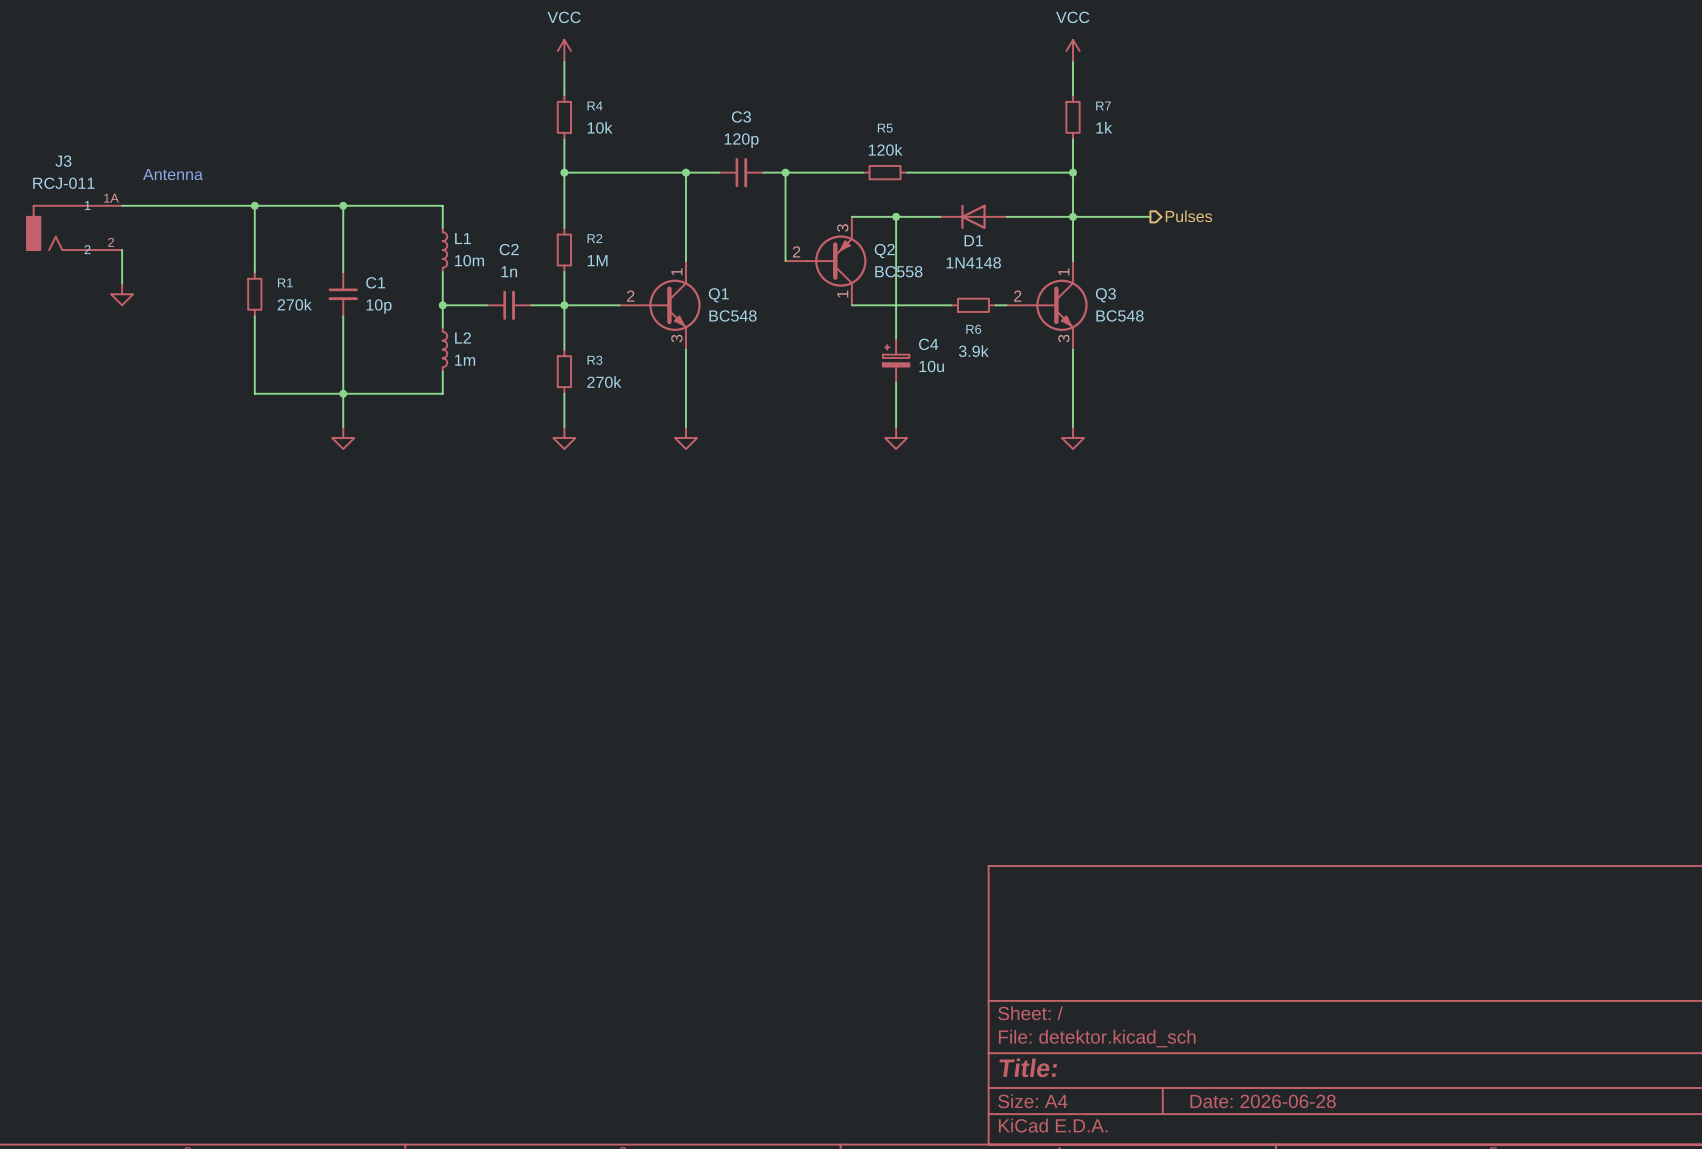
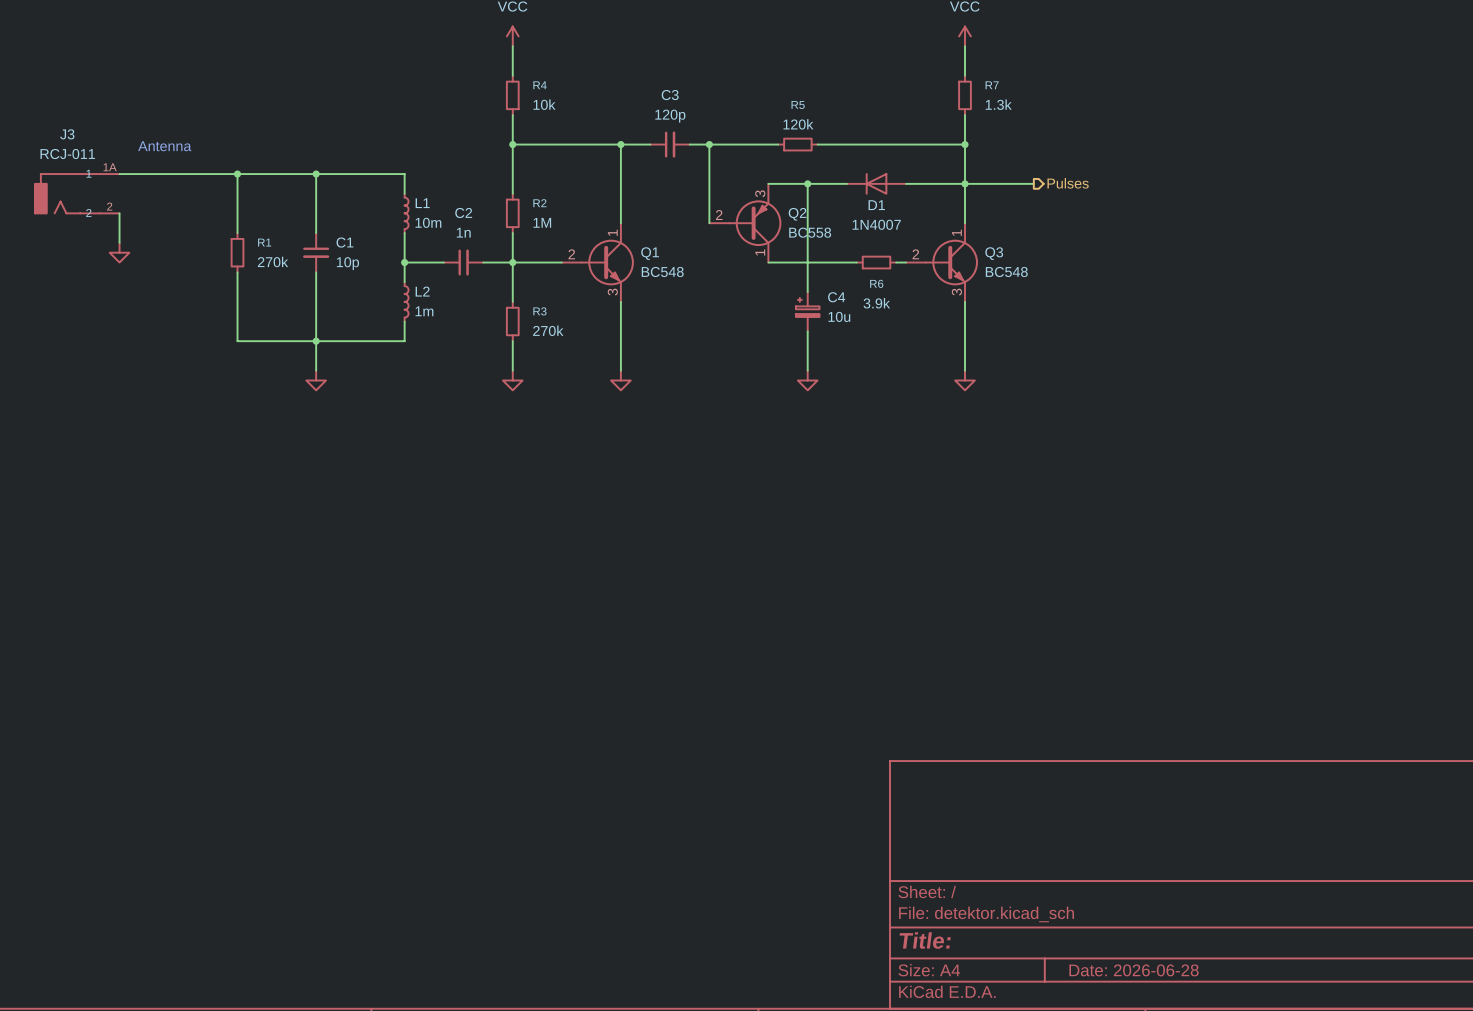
R7 value: 1k (1104, 127) -> 1.3k (998, 104)
D1 value: 1N4148 (973, 262) -> 1N4007 (876, 224)

